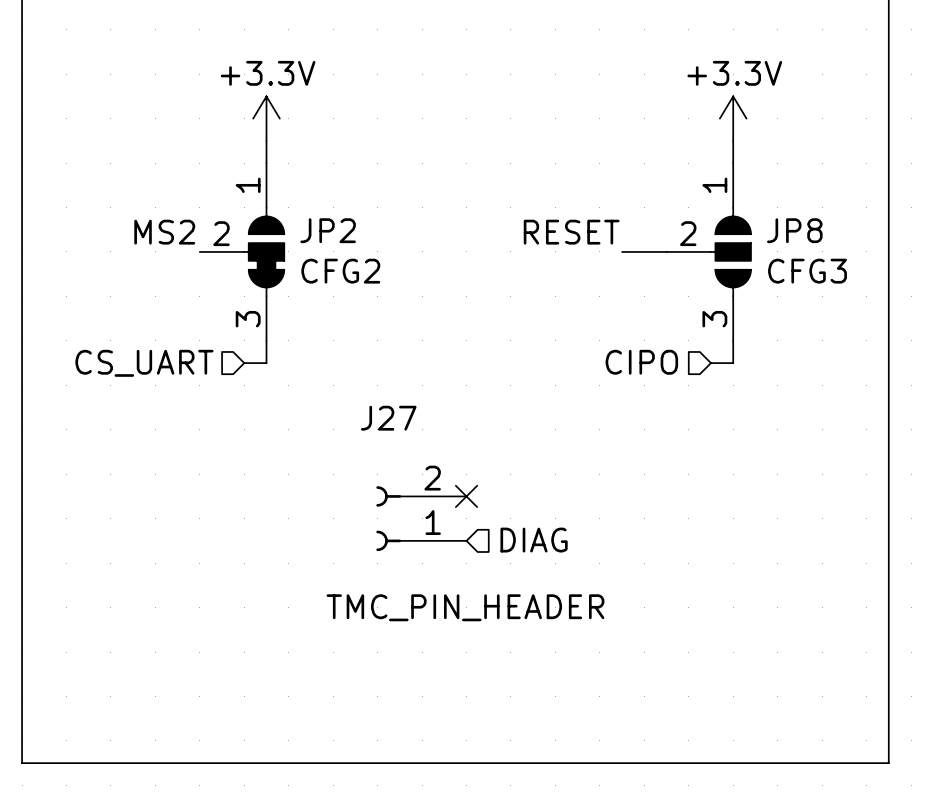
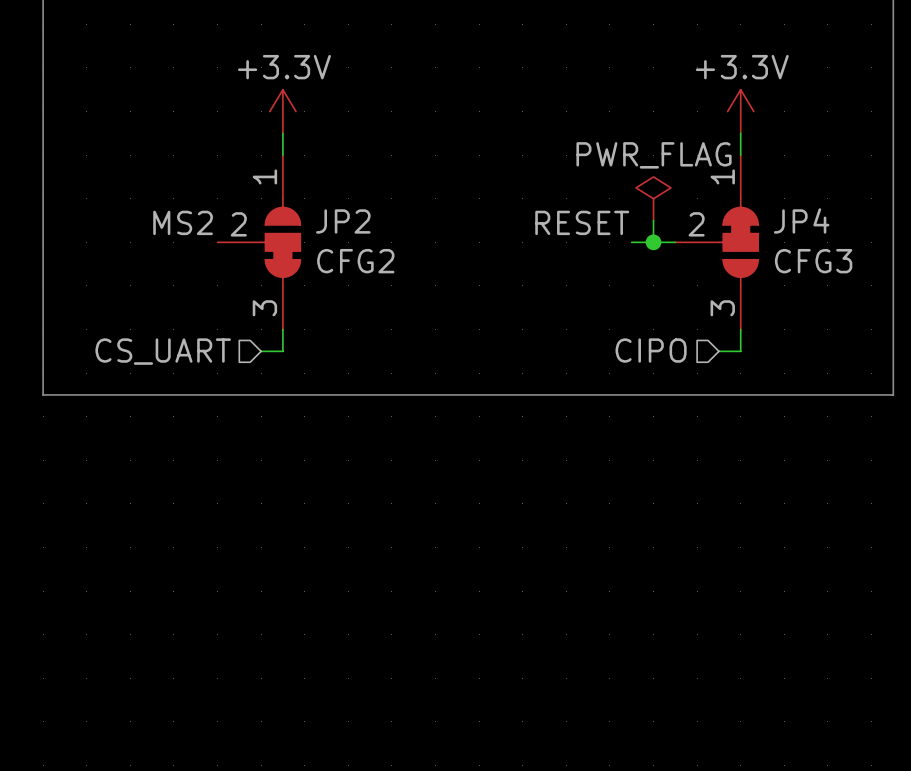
power symbol: none -> PWR_FLAG (653, 198)
wire: none -> (653, 220) (653, 242)
junction: none -> (653, 242)
JP8: CFG3 (708, 251) -> none
JP4: none -> CFG3 (716, 242)
line: (22, 407) (22, 763) (888, 763) (888, 407) -> (43, 394) (893, 394)
no-connect mark: (466, 496) -> none
J27: TMC_PIN_HEADER (421, 518) -> none
hierarchical label: DIAG (534, 540) -> none

